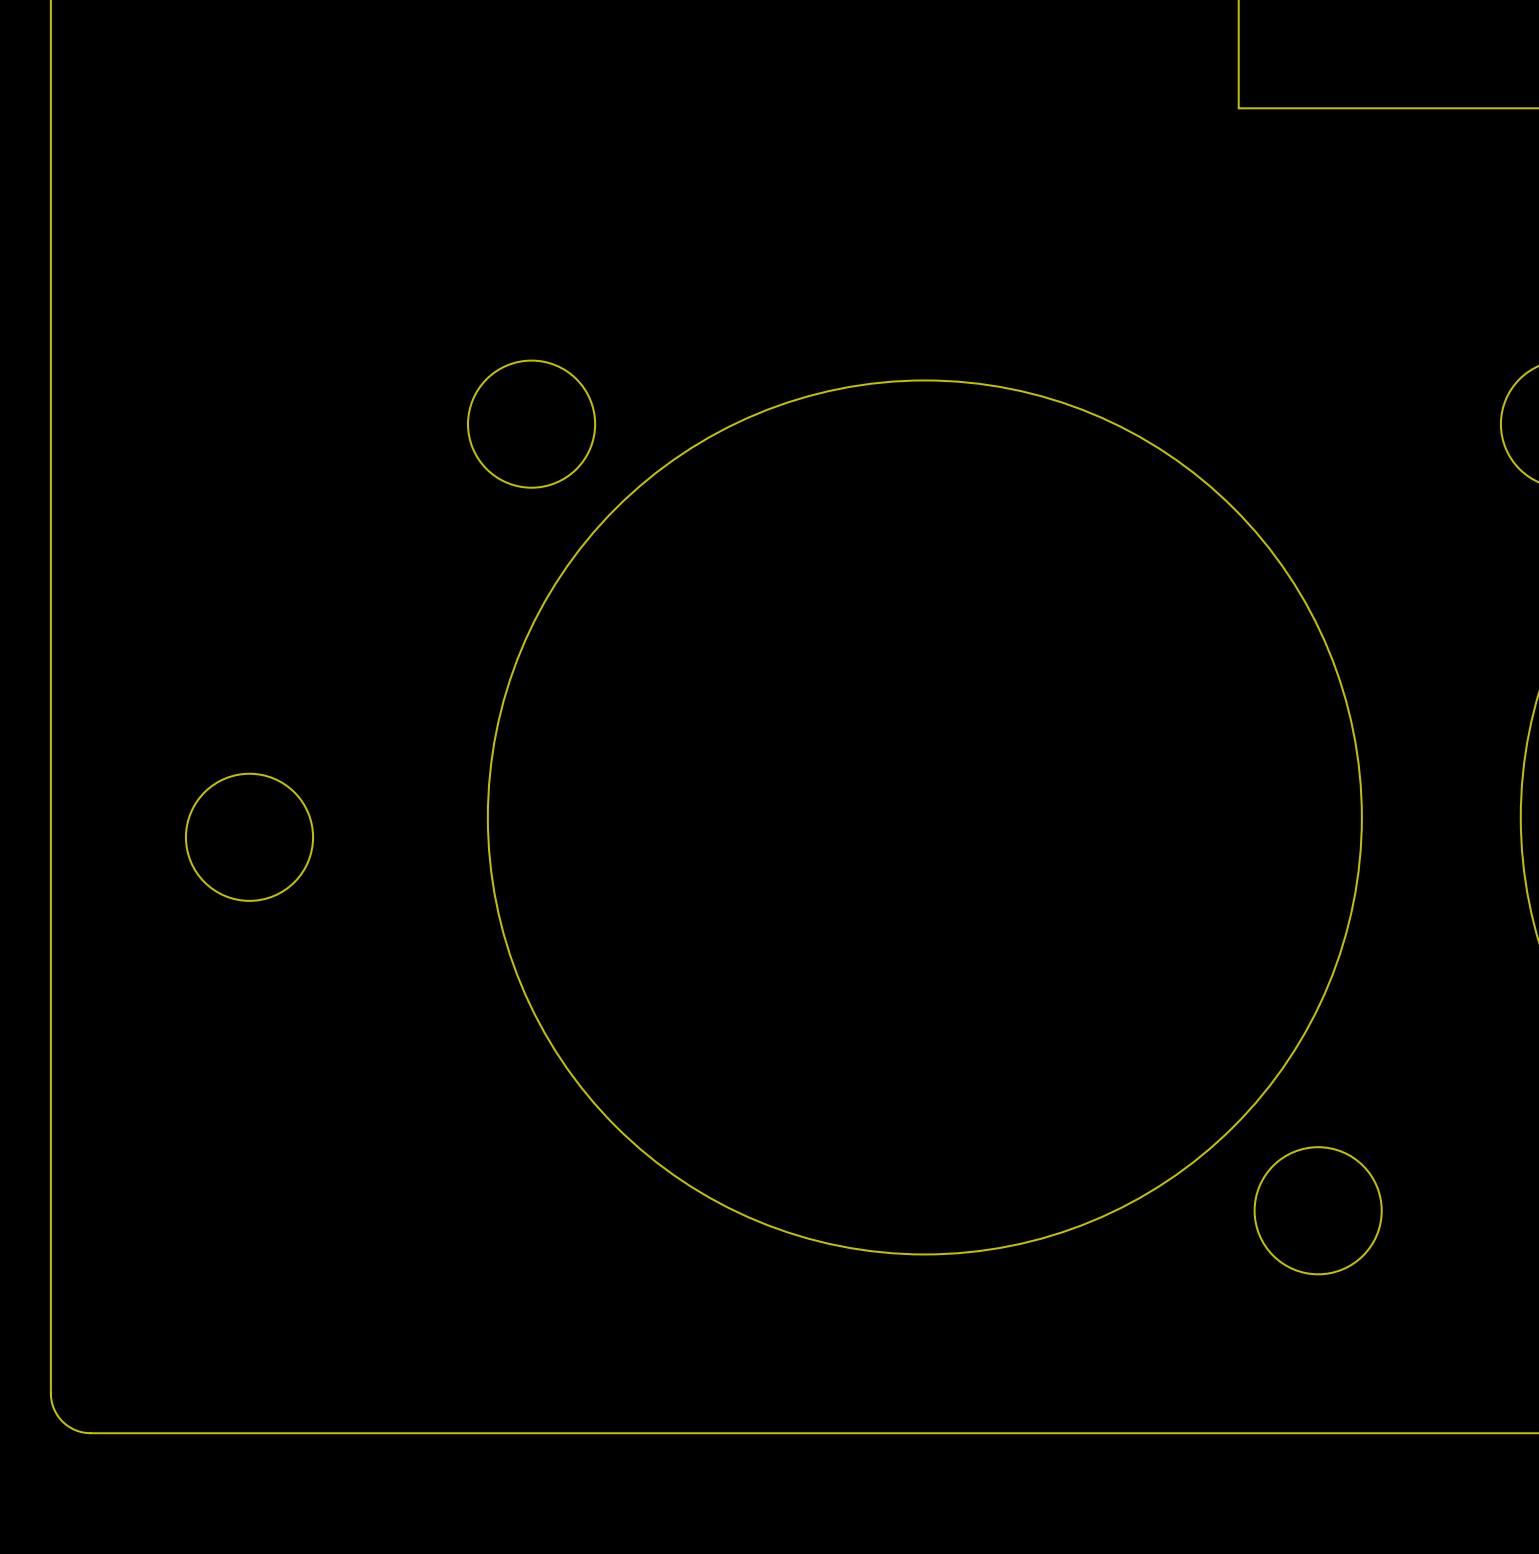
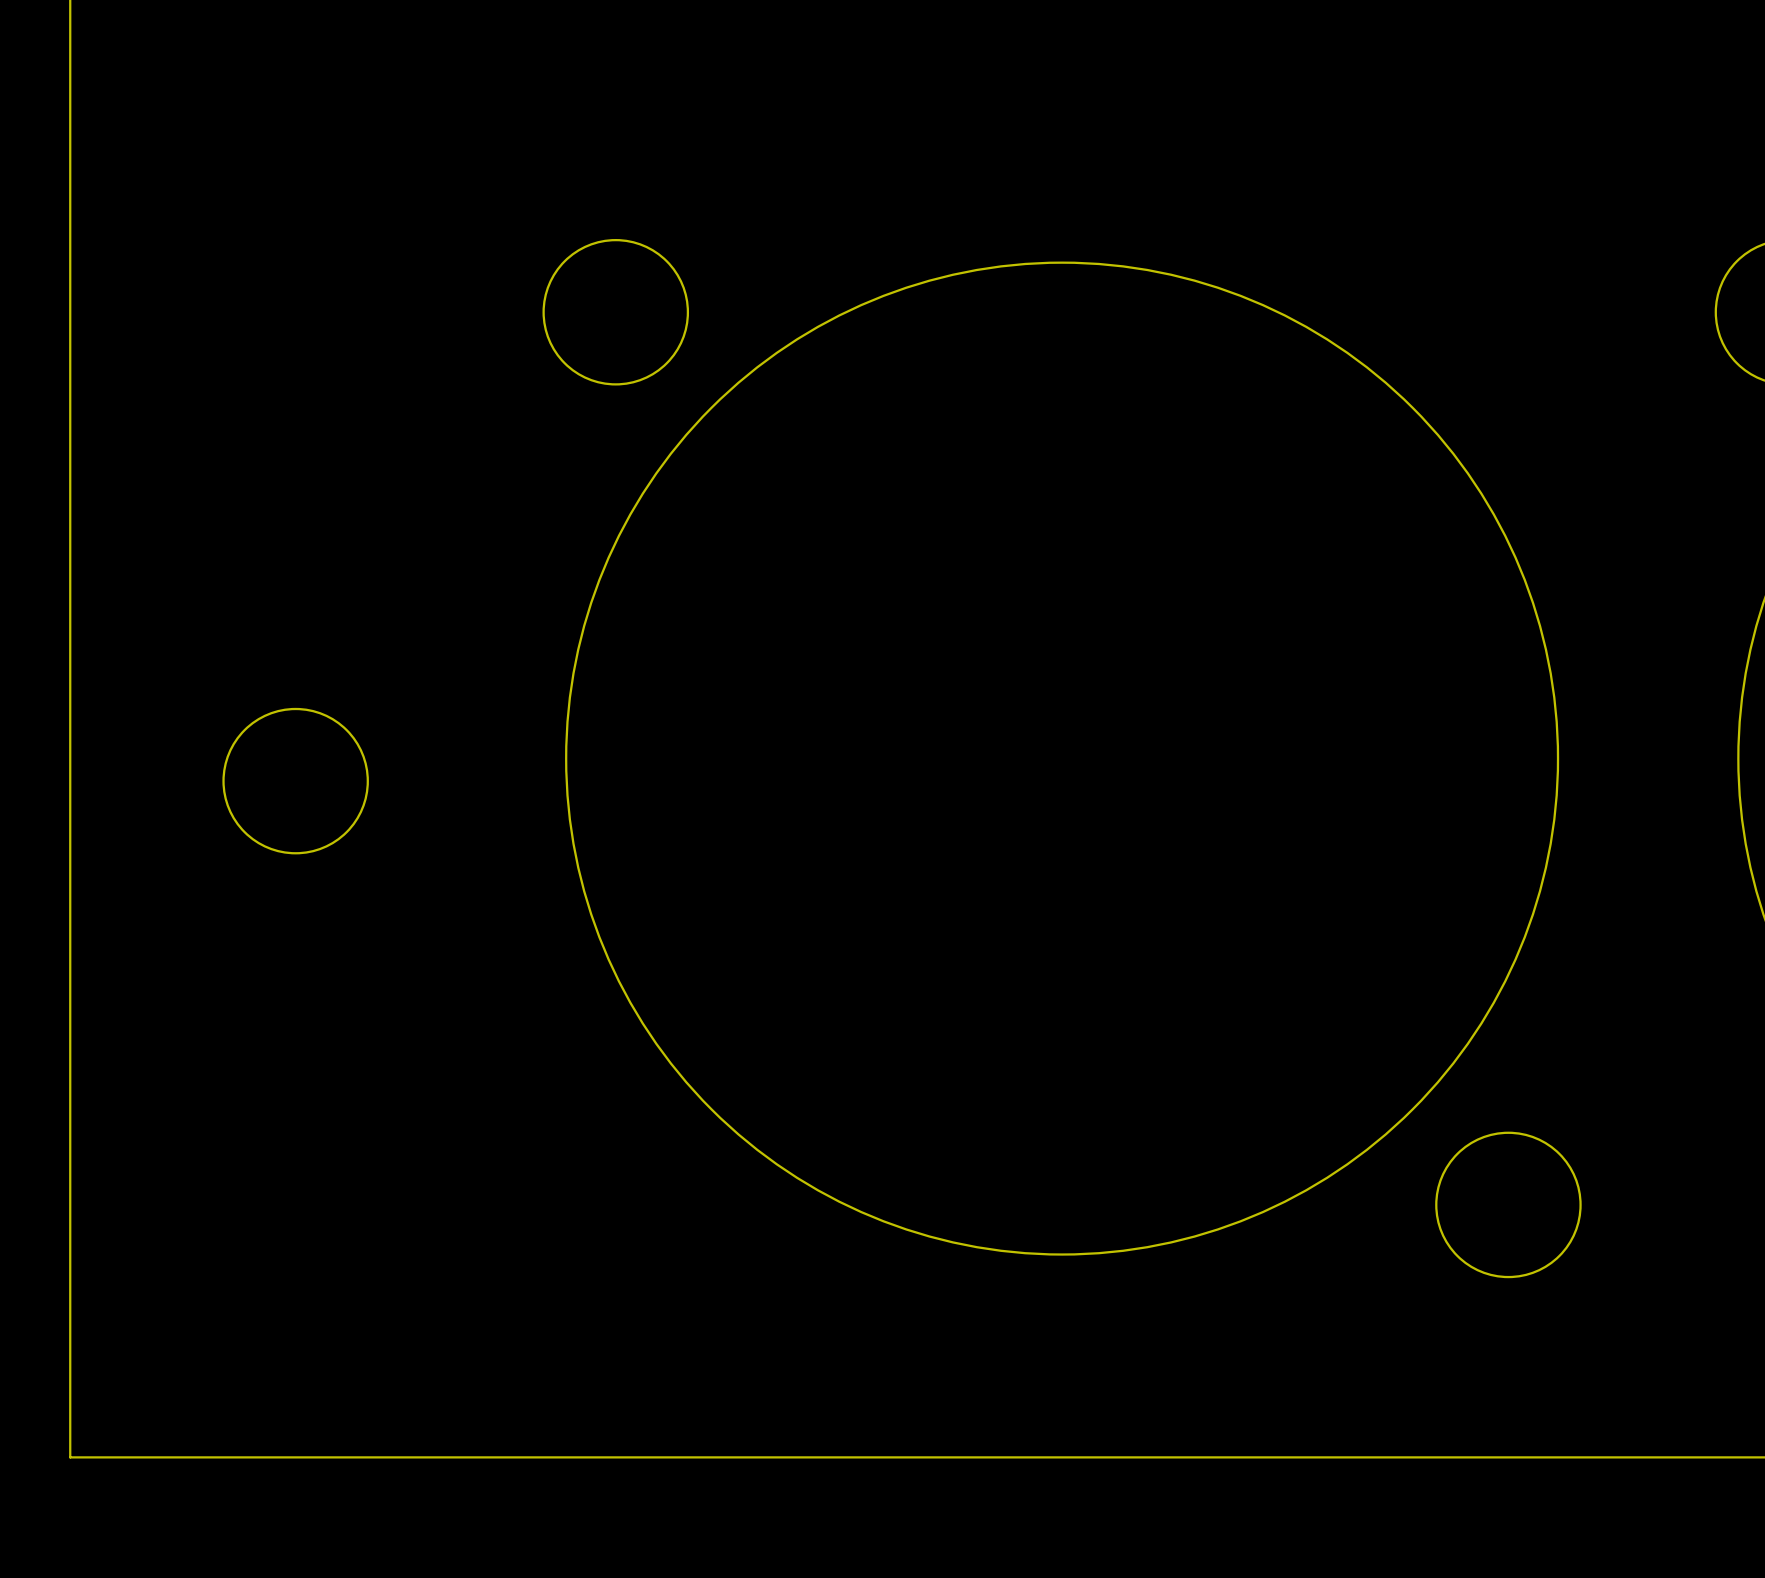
board edge: (50, 1393) (53, 1406) (62, 1421) (73, 1429) (90, 1433) -> (70, 1412) (70, 1457) (115, 1457)

